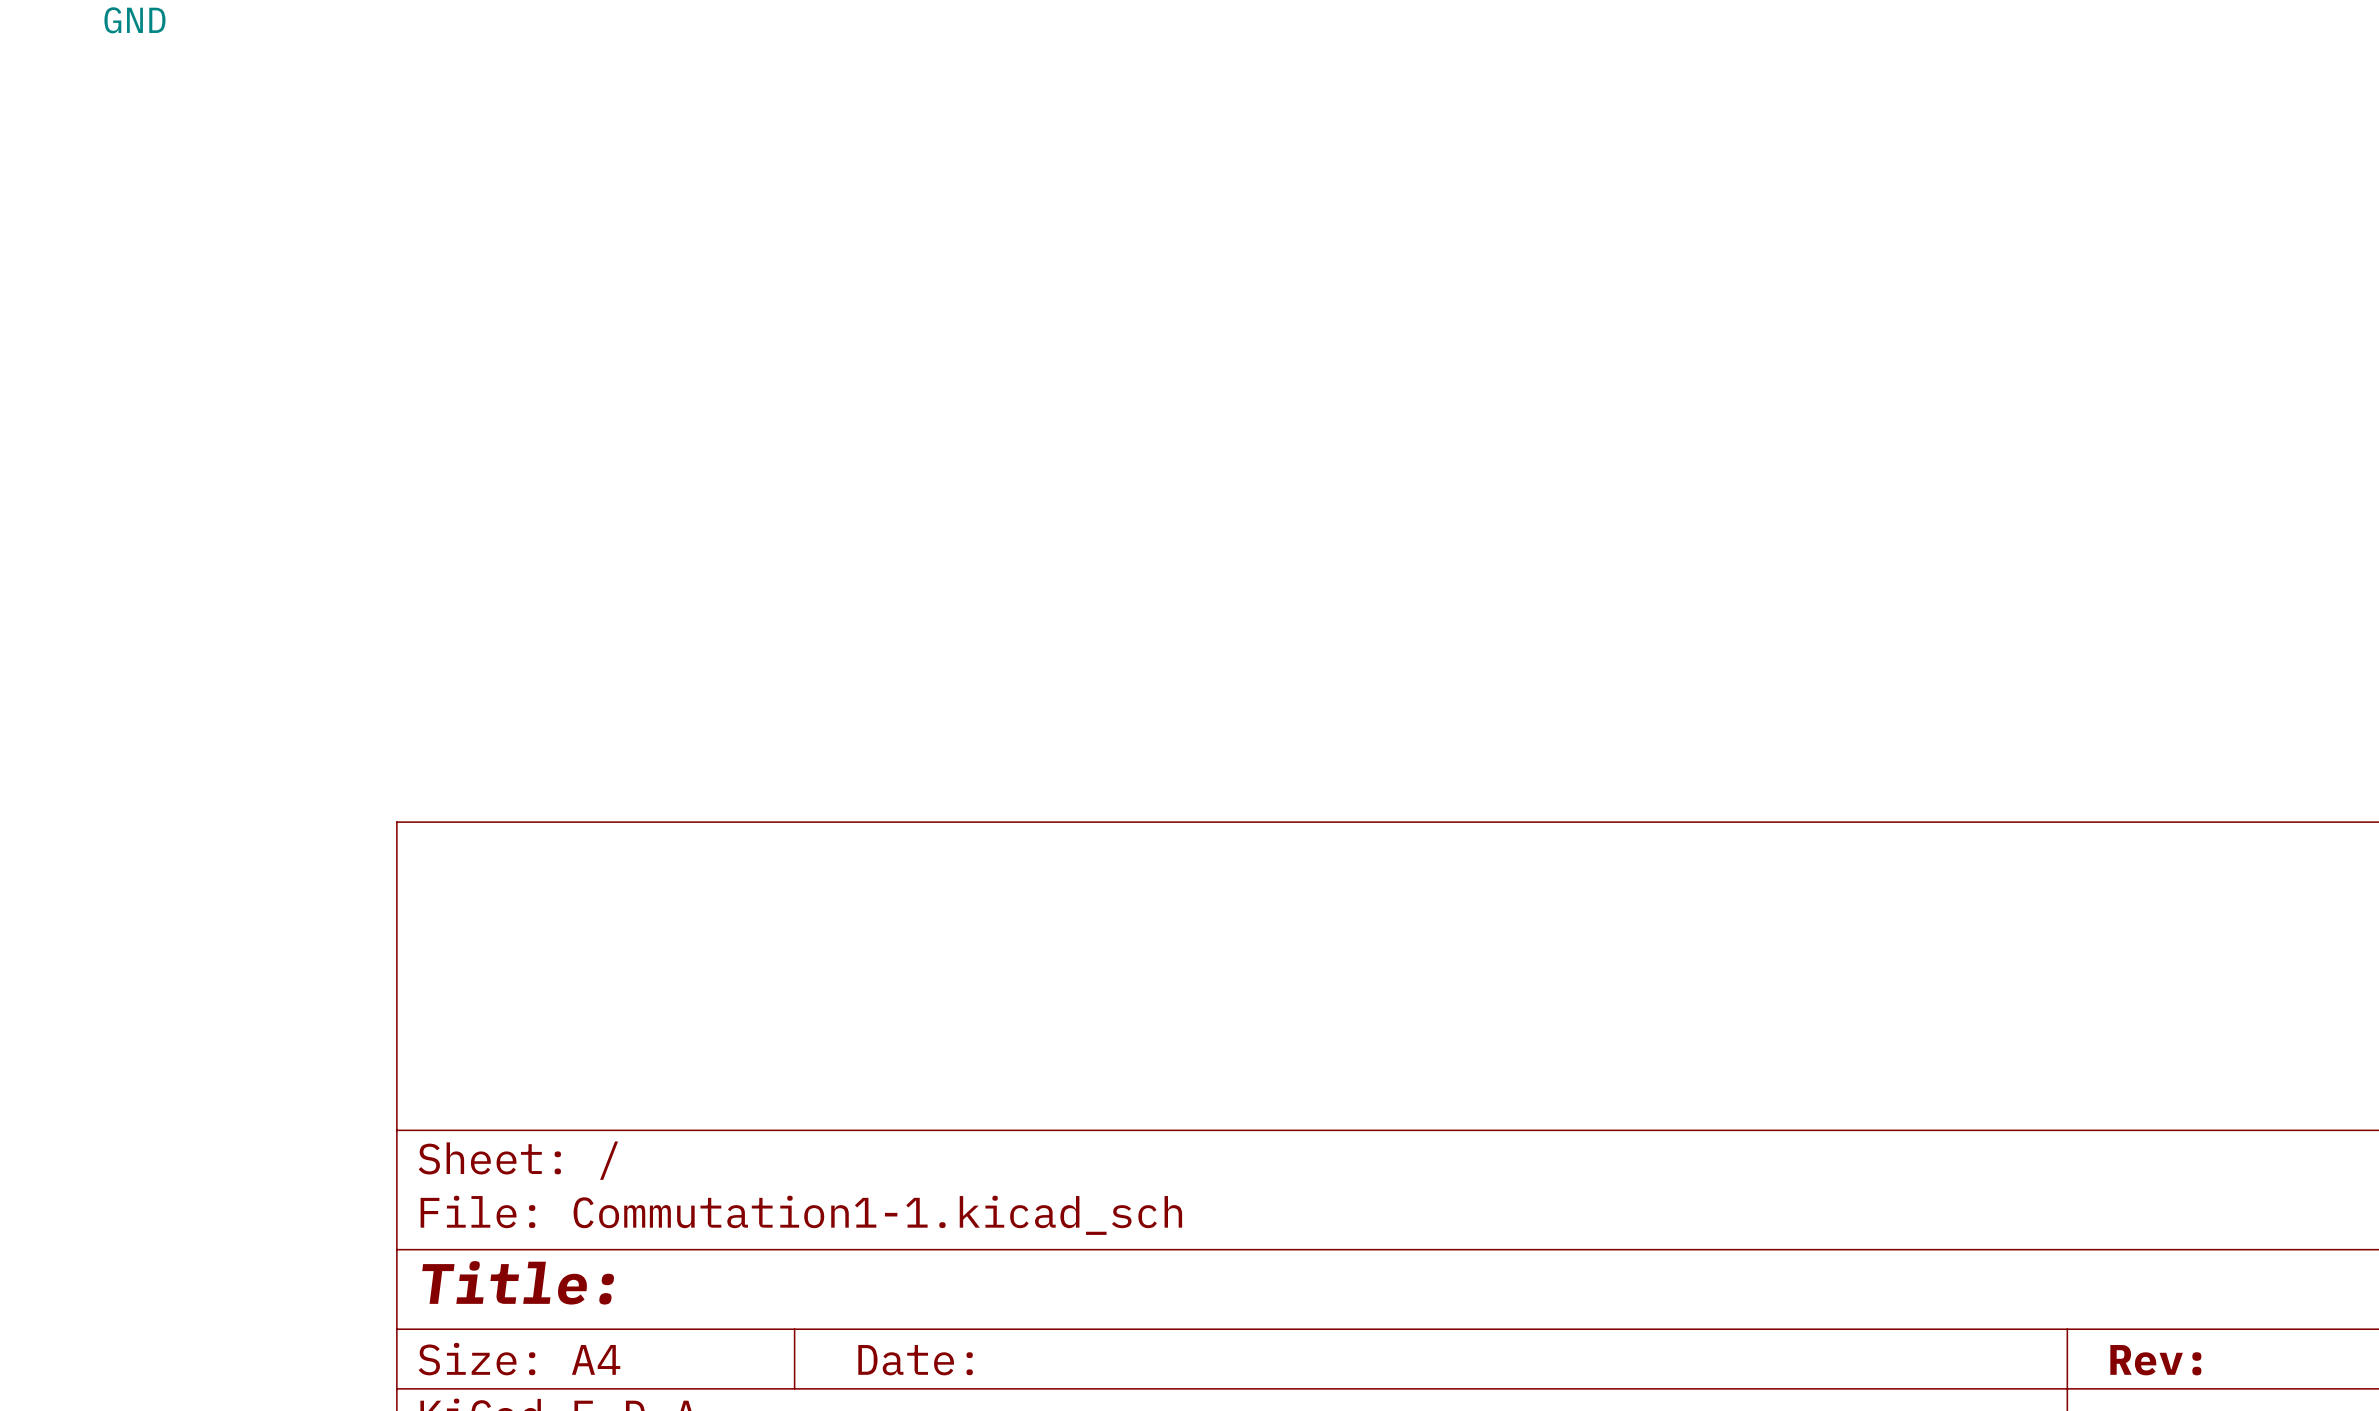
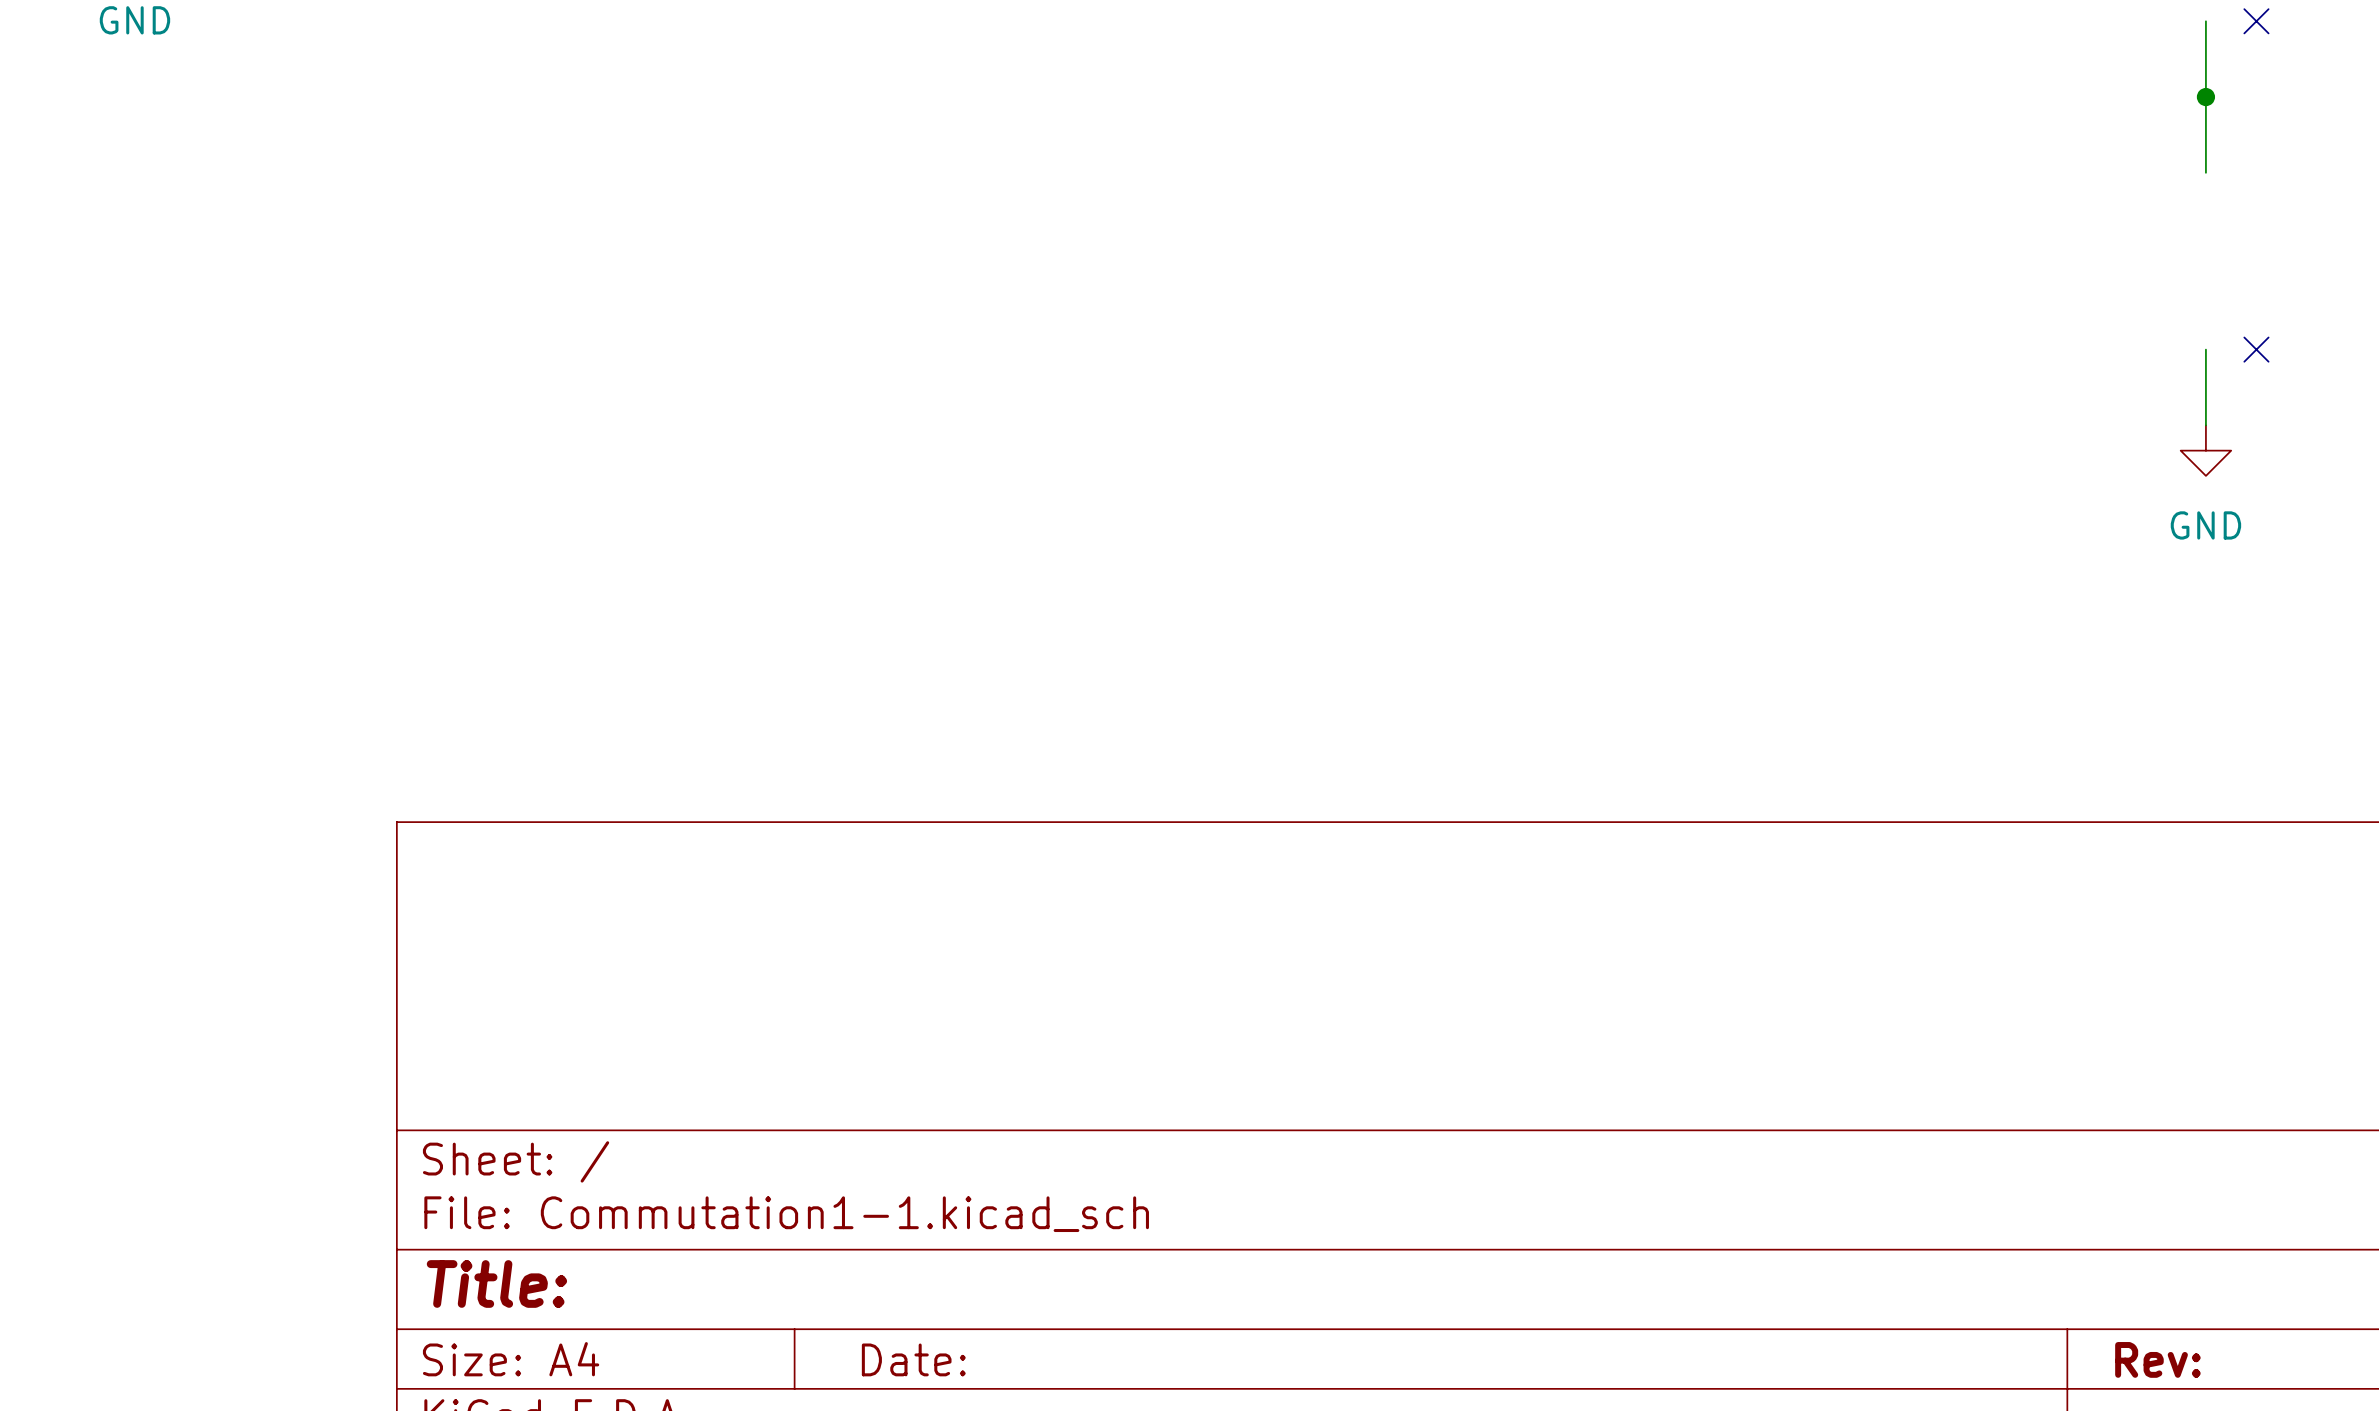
wire: none -> (2205, 21) (2205, 172)
no-connect mark: none -> (2256, 21)
junction: none -> (2205, 97)
wire: none -> (2205, 349) (2205, 425)
no-connect mark: none -> (2256, 349)
power symbol: none -> GND (2205, 450)

